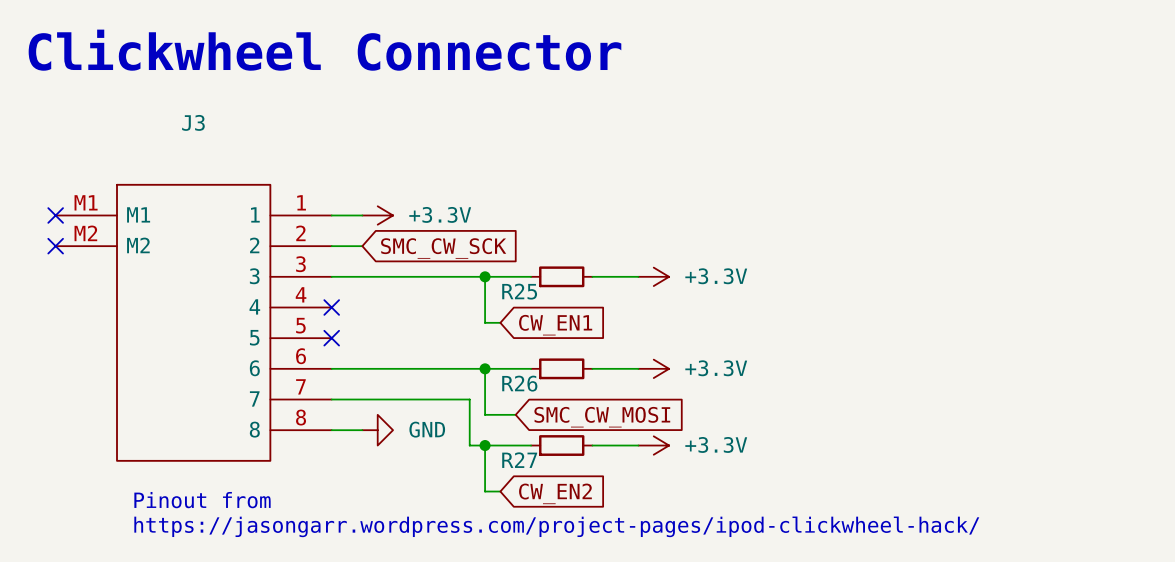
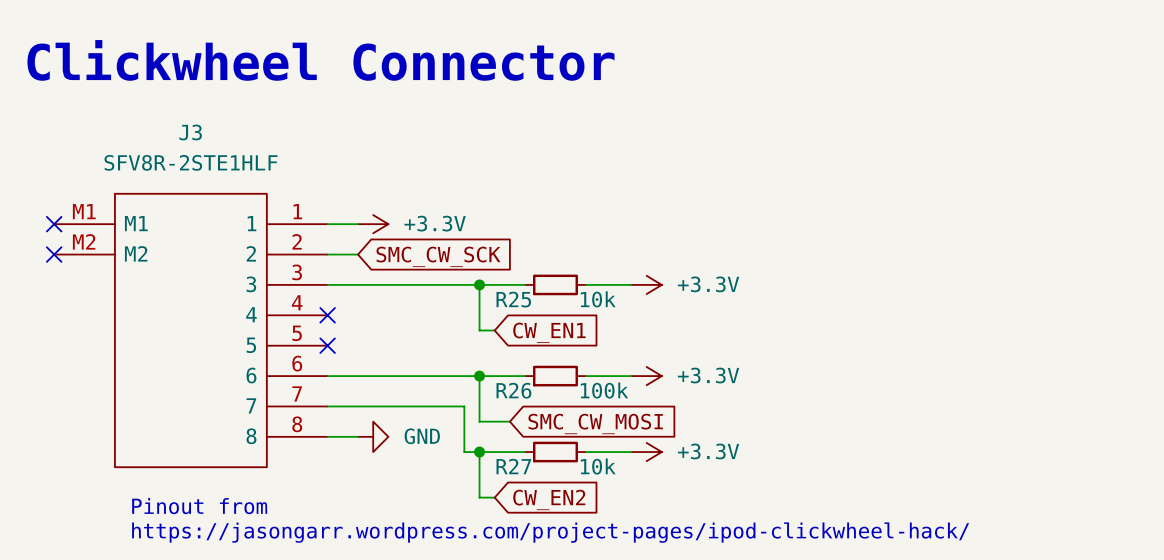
J3 value: none -> SFV8R-2STE1HLF (190, 162)
R25 value: none -> 10k (598, 299)
R26 value: none -> 100k (604, 390)
R27 value: none -> 10k (598, 466)

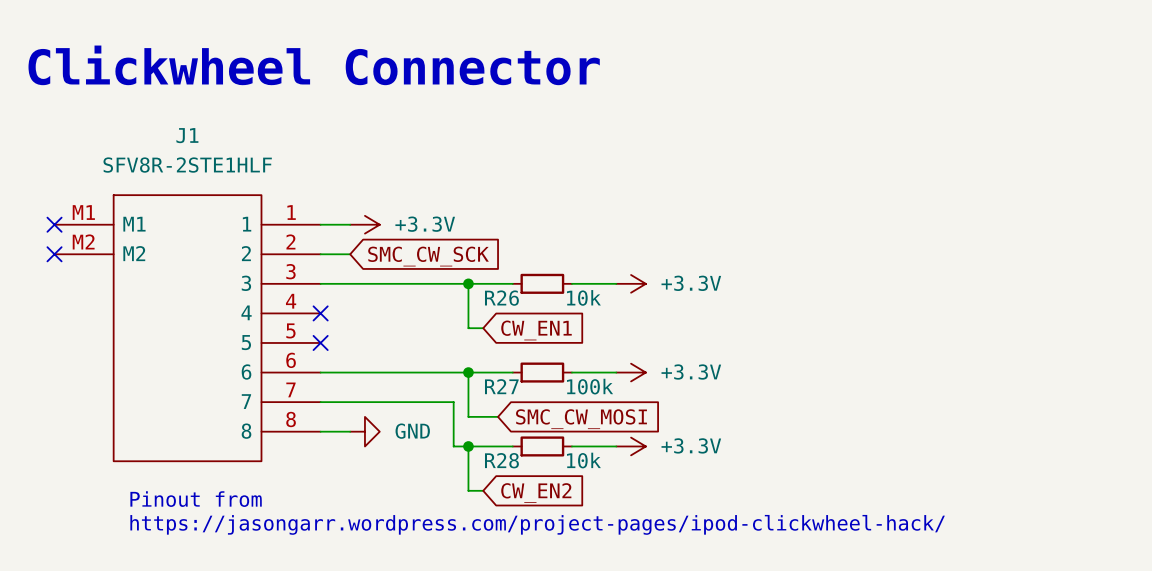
J3 name: J3 (190, 132) -> J1 (187, 135)
R25 name: R25 (513, 299) -> R26 (501, 298)
R26 name: R26 (513, 390) -> R27 (501, 386)
R27 name: R27 (513, 466) -> R28 (501, 460)

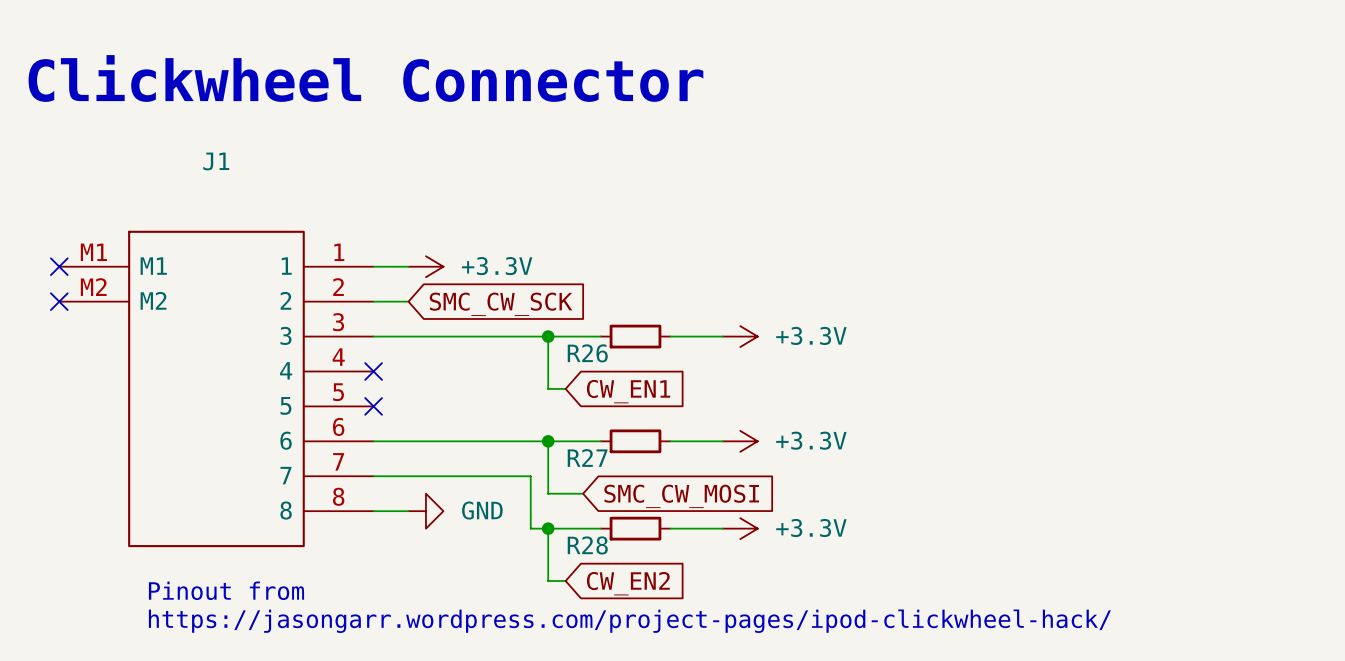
J1 value: SFV8R-2STE1HLF (187, 165) -> none
R26 value: 10k (583, 297) -> none
R27 value: 100k (590, 386) -> none
R28 value: 10k (583, 460) -> none

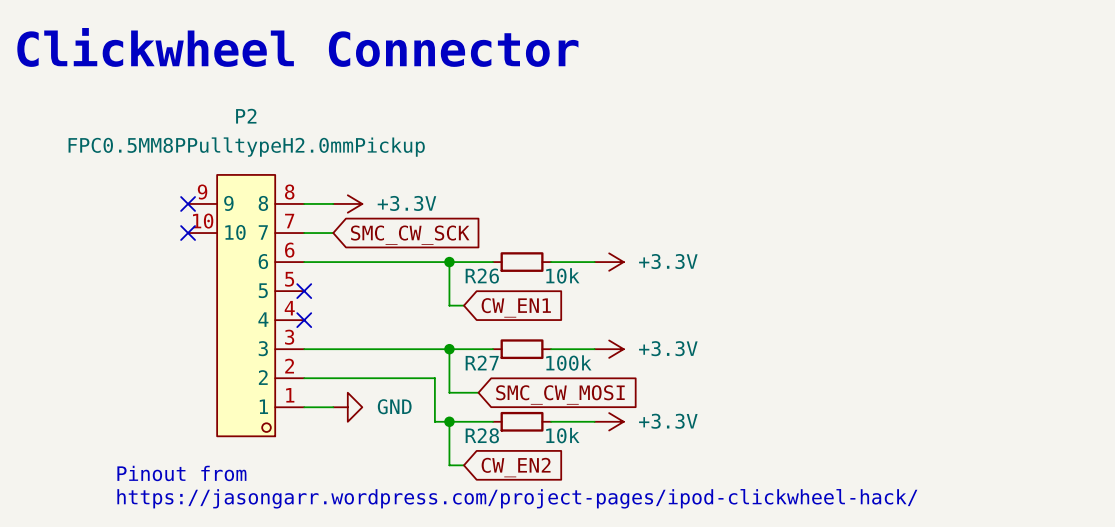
no-connect mark: (59, 266) -> none
no-connect mark: none -> (188, 203)
no-connect mark: (59, 301) -> none
no-connect mark: none -> (188, 233)
R26 value: none -> 10k (562, 275)
J1: (216, 388) -> none
P2: none -> FPC0.5MM8PPulltypeH2.0mmPickup (246, 305)
R27 value: none -> 100k (568, 362)
R28 value: none -> 10k (562, 435)

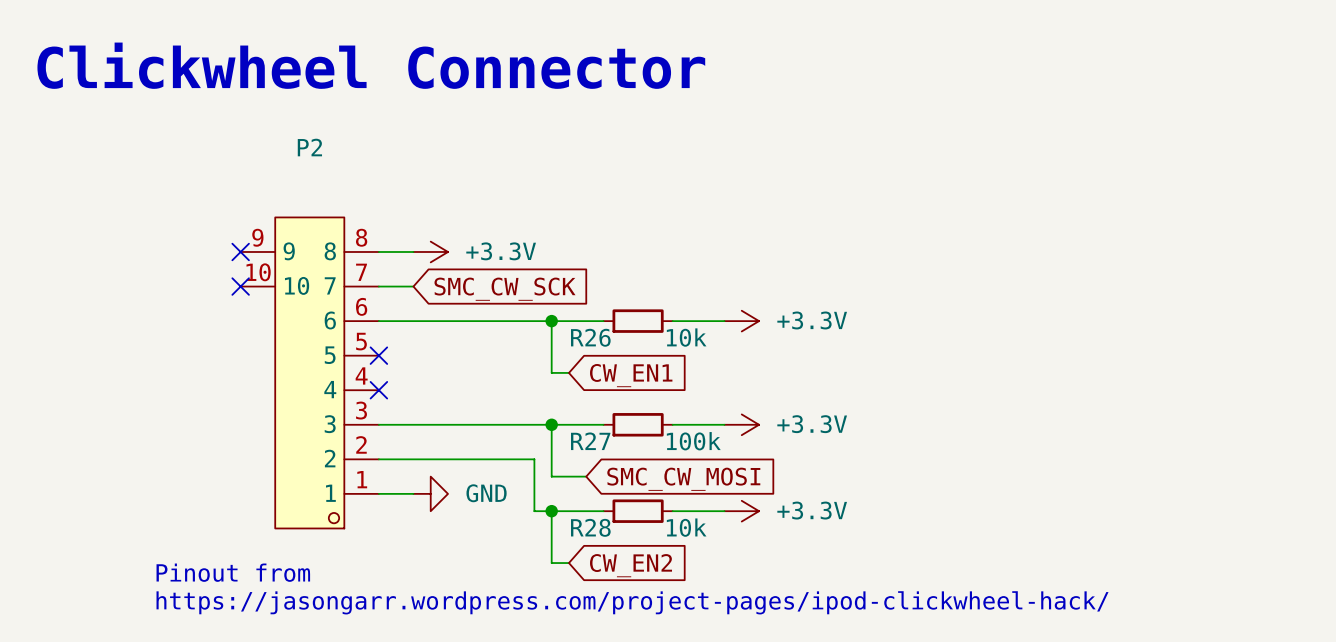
P2 value: FPC0.5MM8PPulltypeH2.0mmPickup (246, 147) -> none

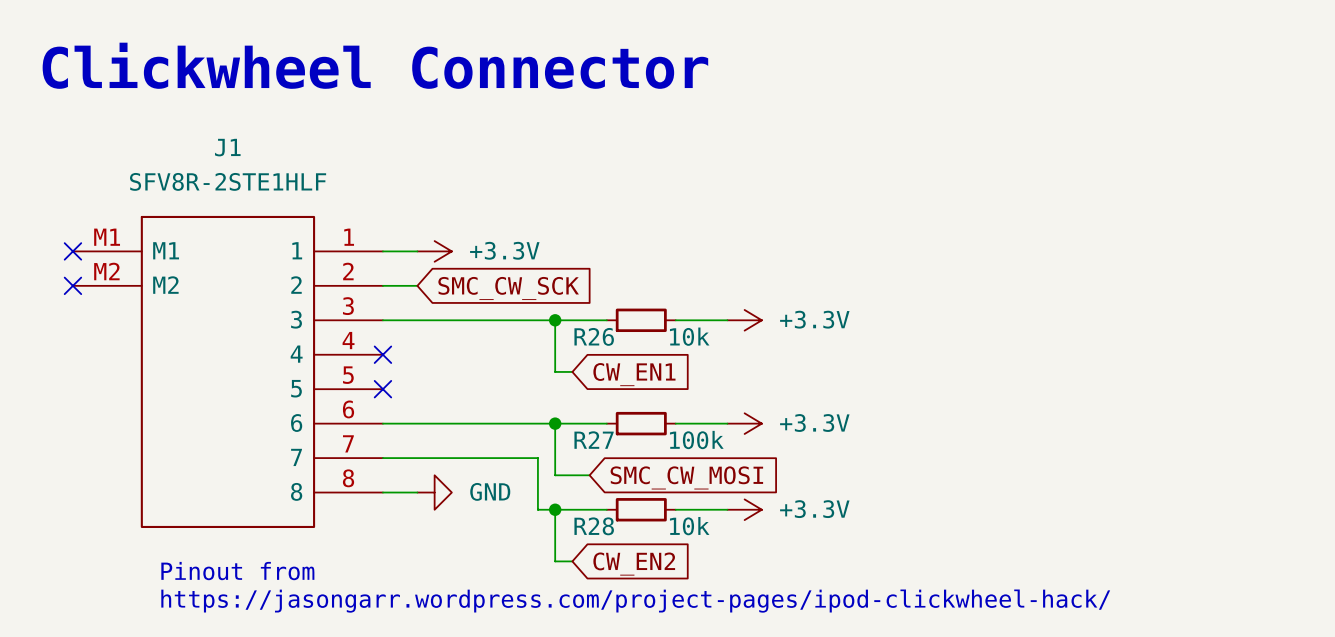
no-connect mark: none -> (72, 251)
no-connect mark: (240, 251) -> none
no-connect mark: none -> (72, 285)
no-connect mark: (240, 286) -> none
J1: none -> SFV8R-2STE1HLF (227, 371)
P2: (309, 372) -> none

